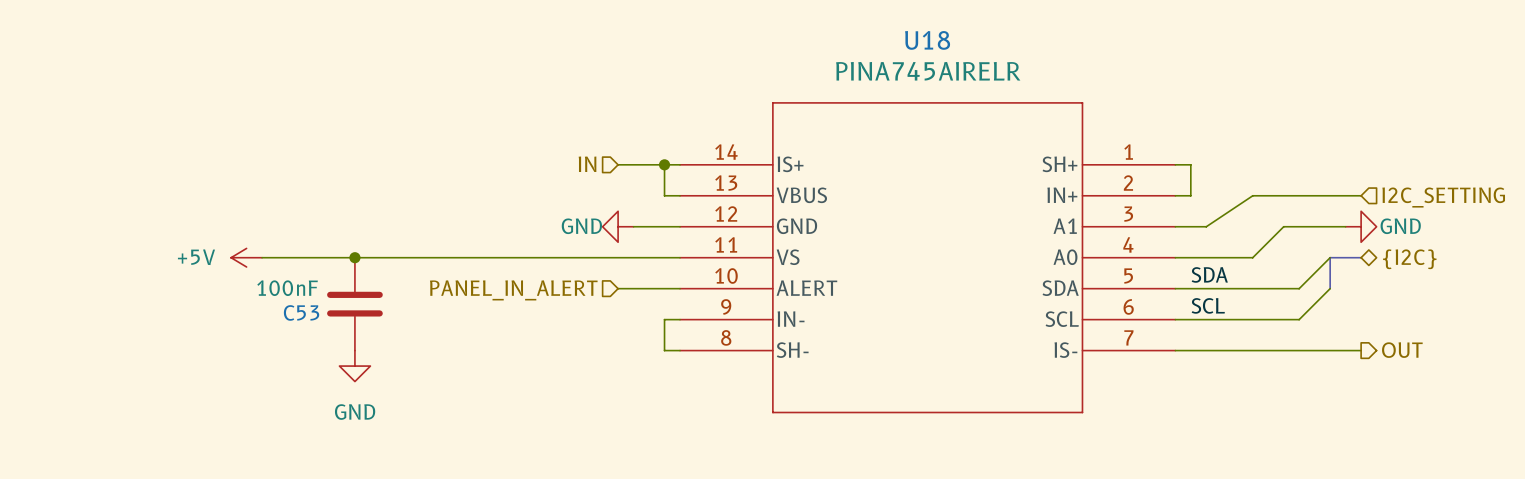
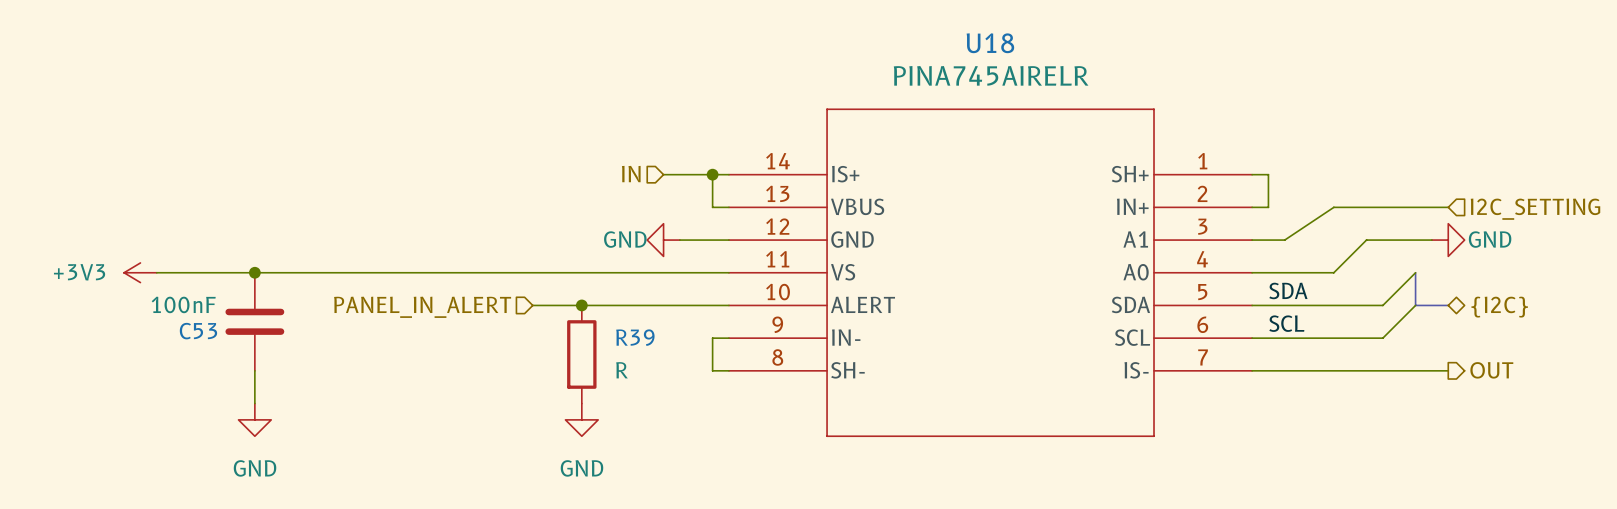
power symbol: none -> +3V3 (140, 272)
wire: none -> (156, 272) (287, 272)
junction: none -> (254, 272)
power symbol: +5V (246, 257) -> none
junction: (354, 257) -> none
bus: (1330, 257) (1361, 257) -> (1415, 305) (1448, 305)
hierarchical label position: {I2C} (1409, 259) -> {I2C} (1499, 307)
wire: none -> (532, 305) (663, 305)
junction: none -> (581, 305)
hierarchical label position: PANEL_IN_ALERT (513, 290) -> PANEL_IN_ALERT (422, 307)
C53 position: (354, 304) -> (254, 321)
R39: none -> R (581, 354)
wire: none -> (254, 370) (254, 403)
power symbol: GND (354, 366) -> none
power symbol: none -> GND (254, 419)
power symbol: none -> GND (581, 419)

